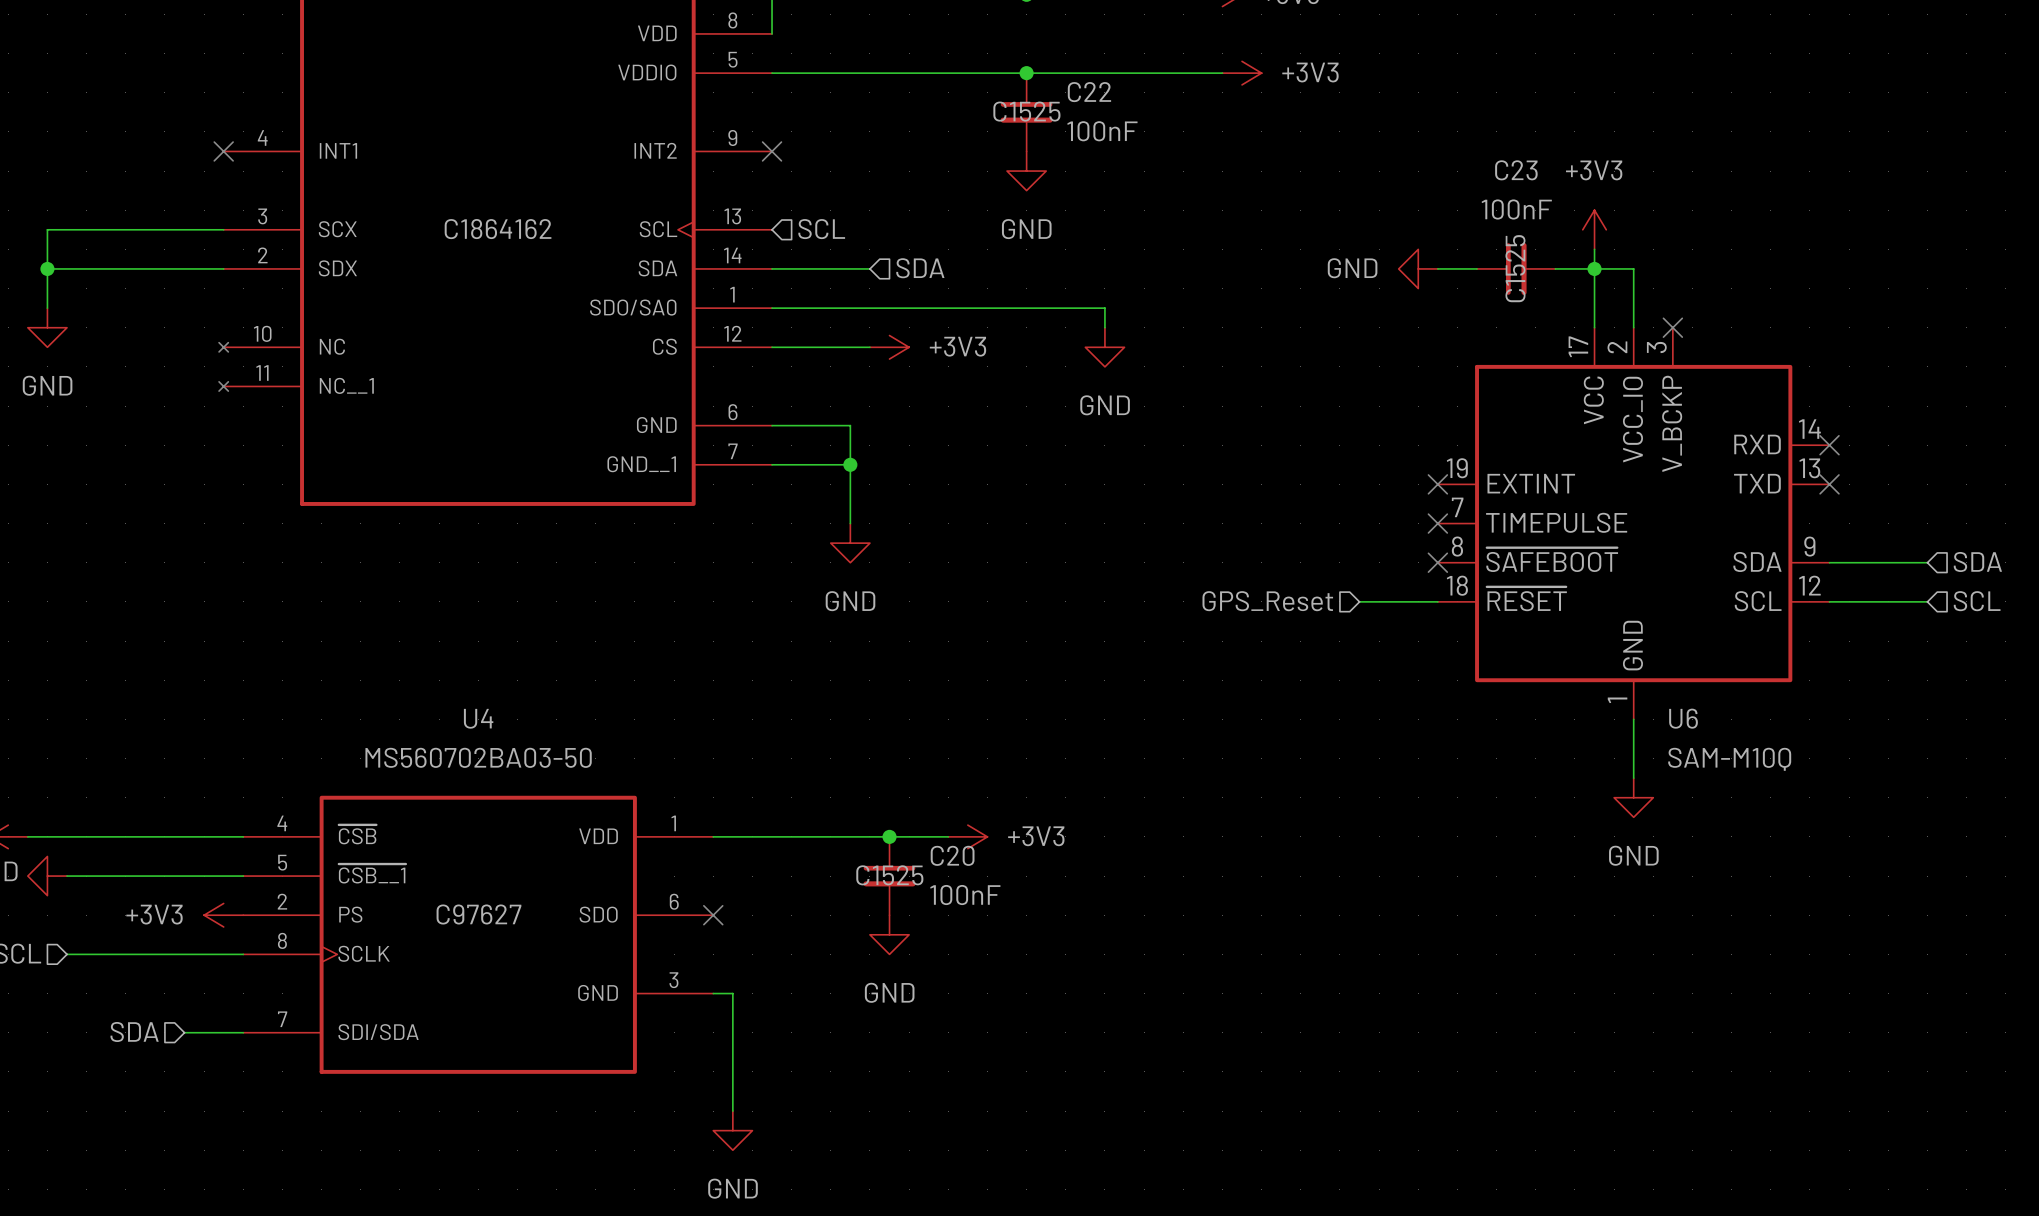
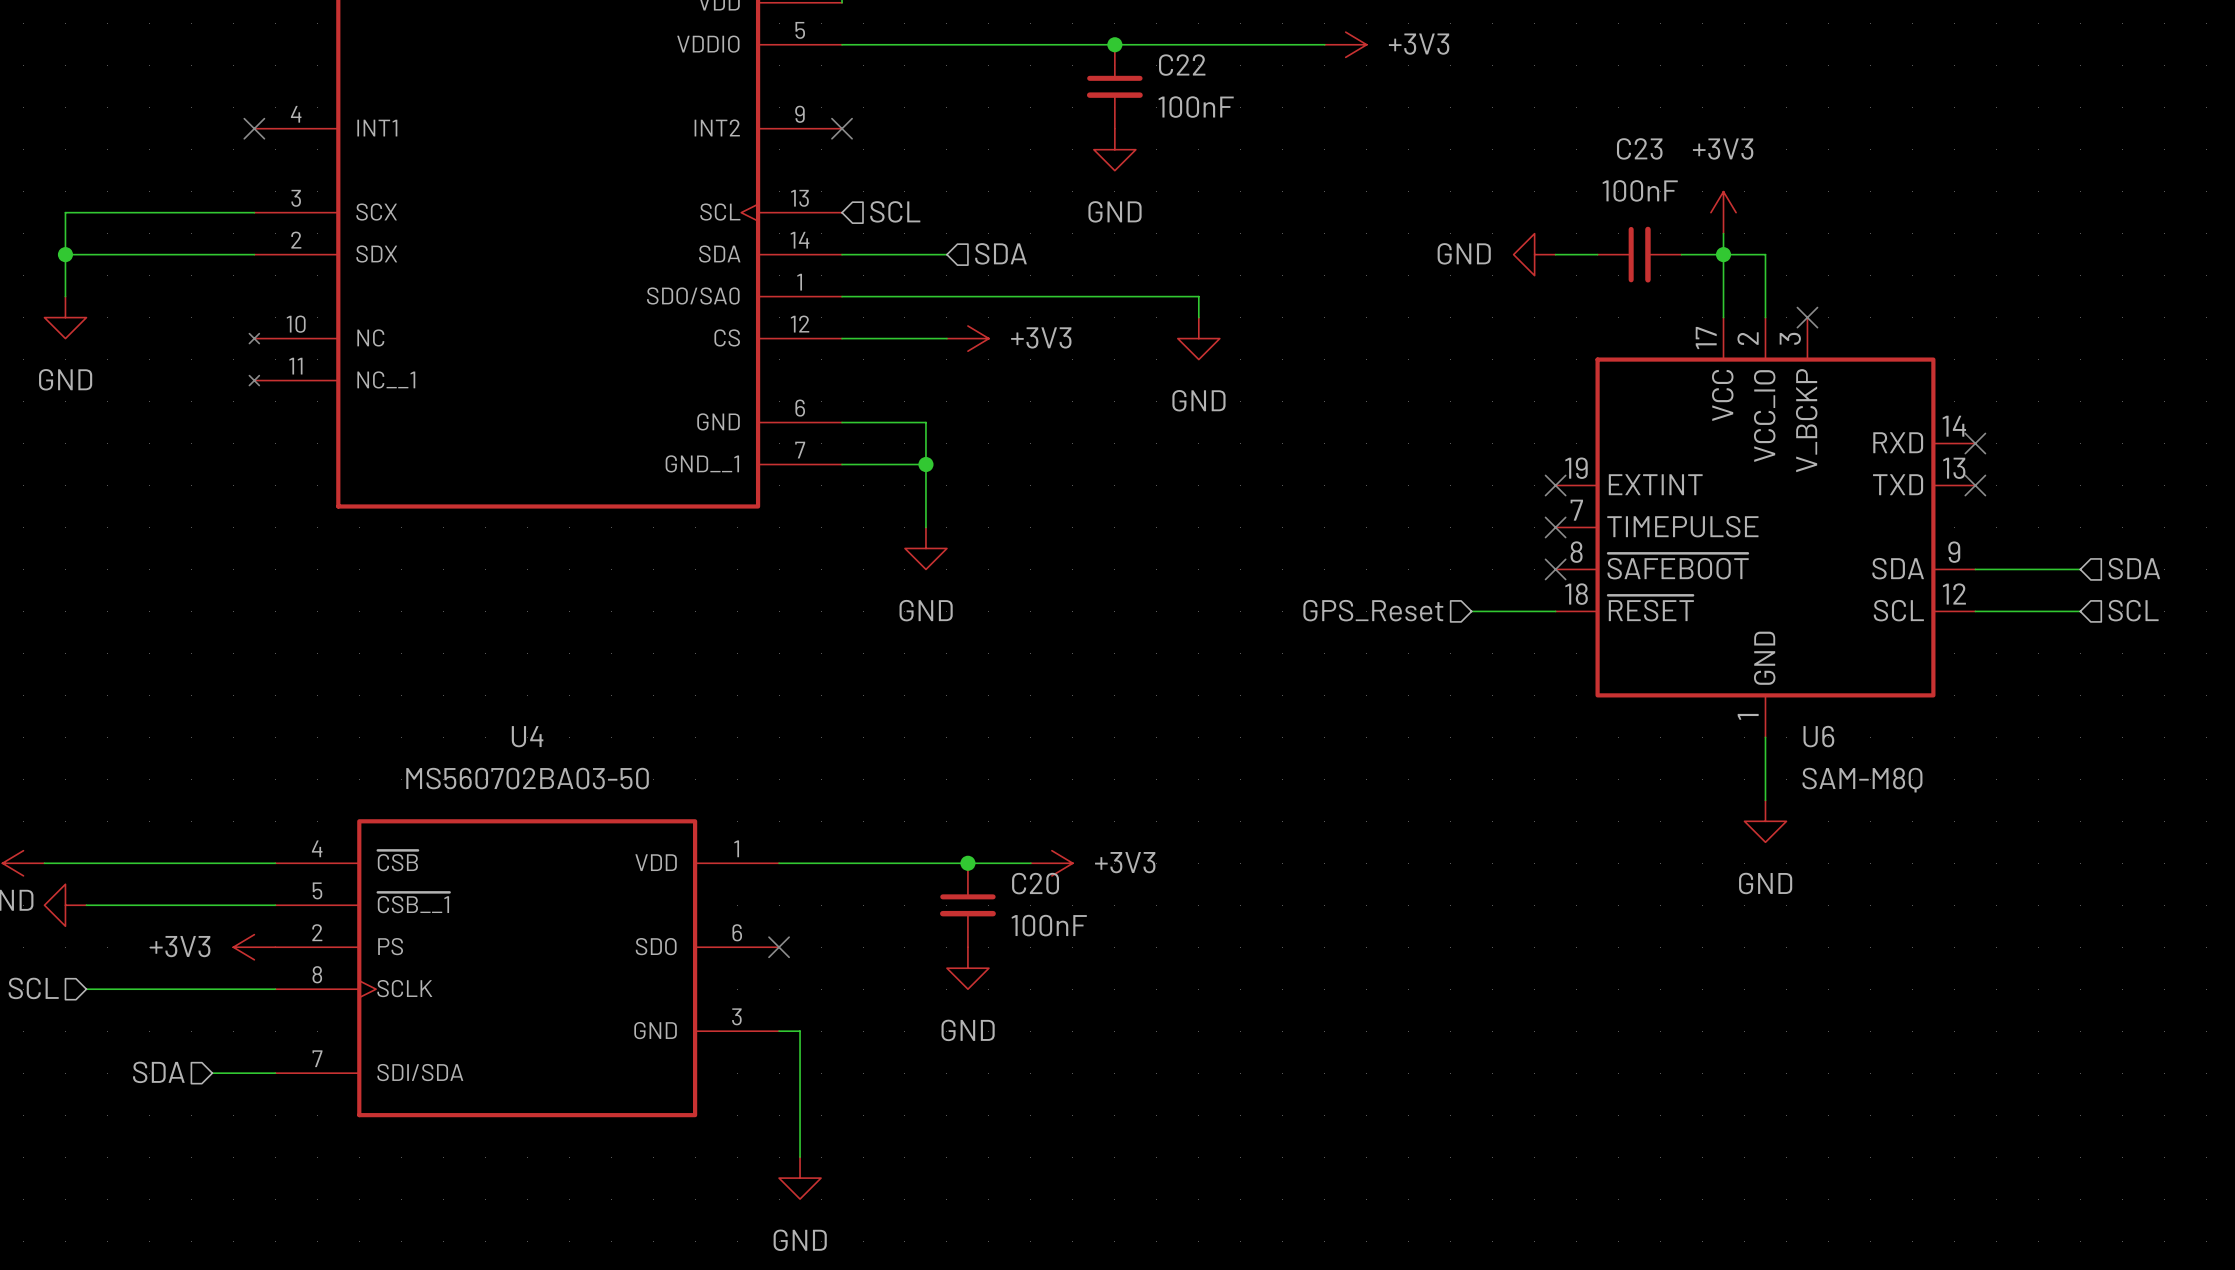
C22 text: C1525 (1026, 111) -> none
part text: C1864162 (498, 229) -> none
C23 text: C1525 (1515, 268) -> none
U6 value: SAM-M10Q (1729, 759) -> SAM-M8Q (1862, 780)
C20 text: C1525 (889, 875) -> none
U4 text: C97627 (478, 914) -> none

